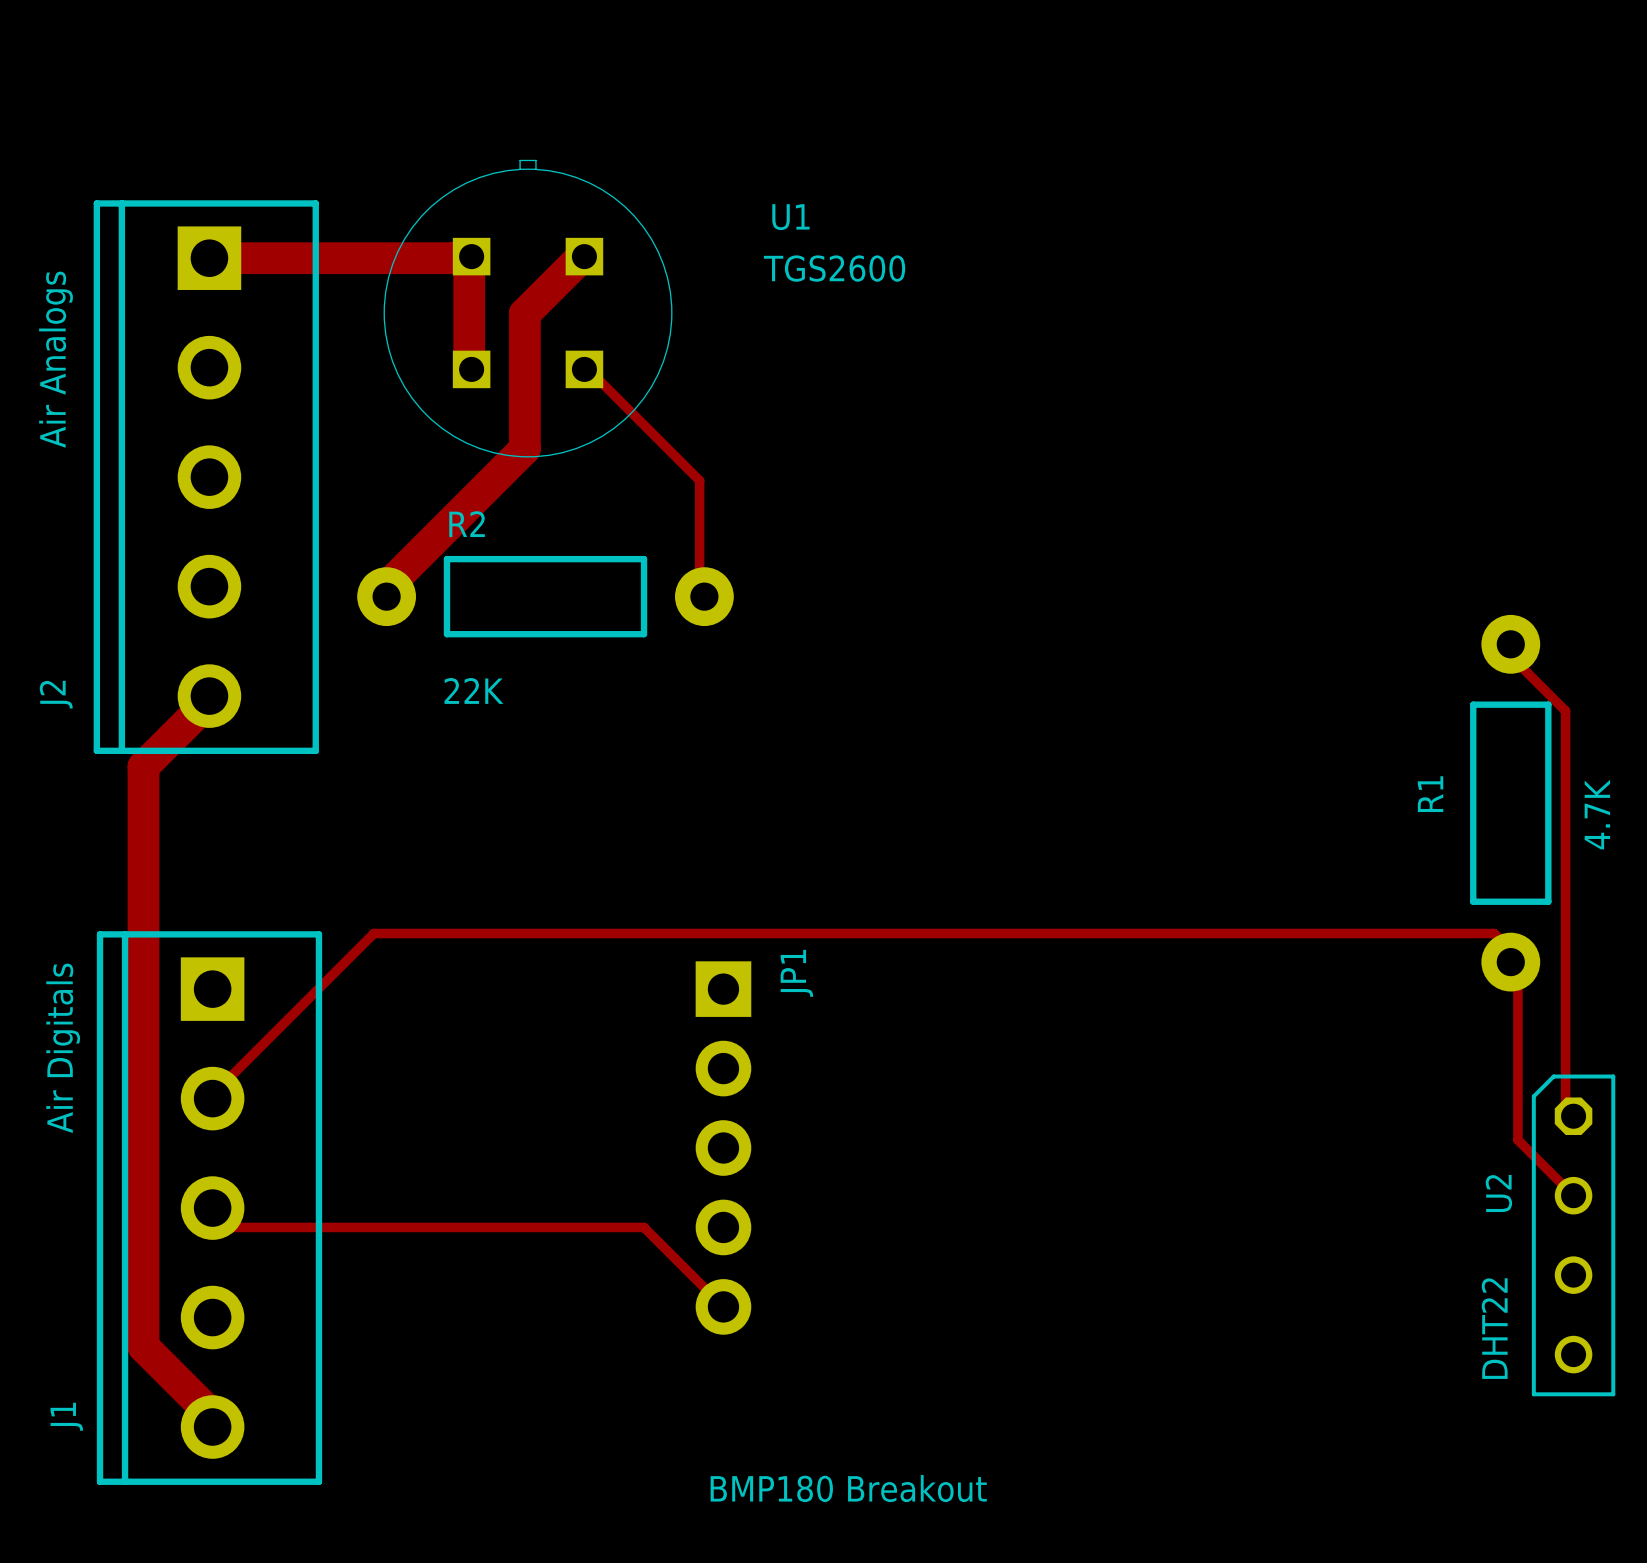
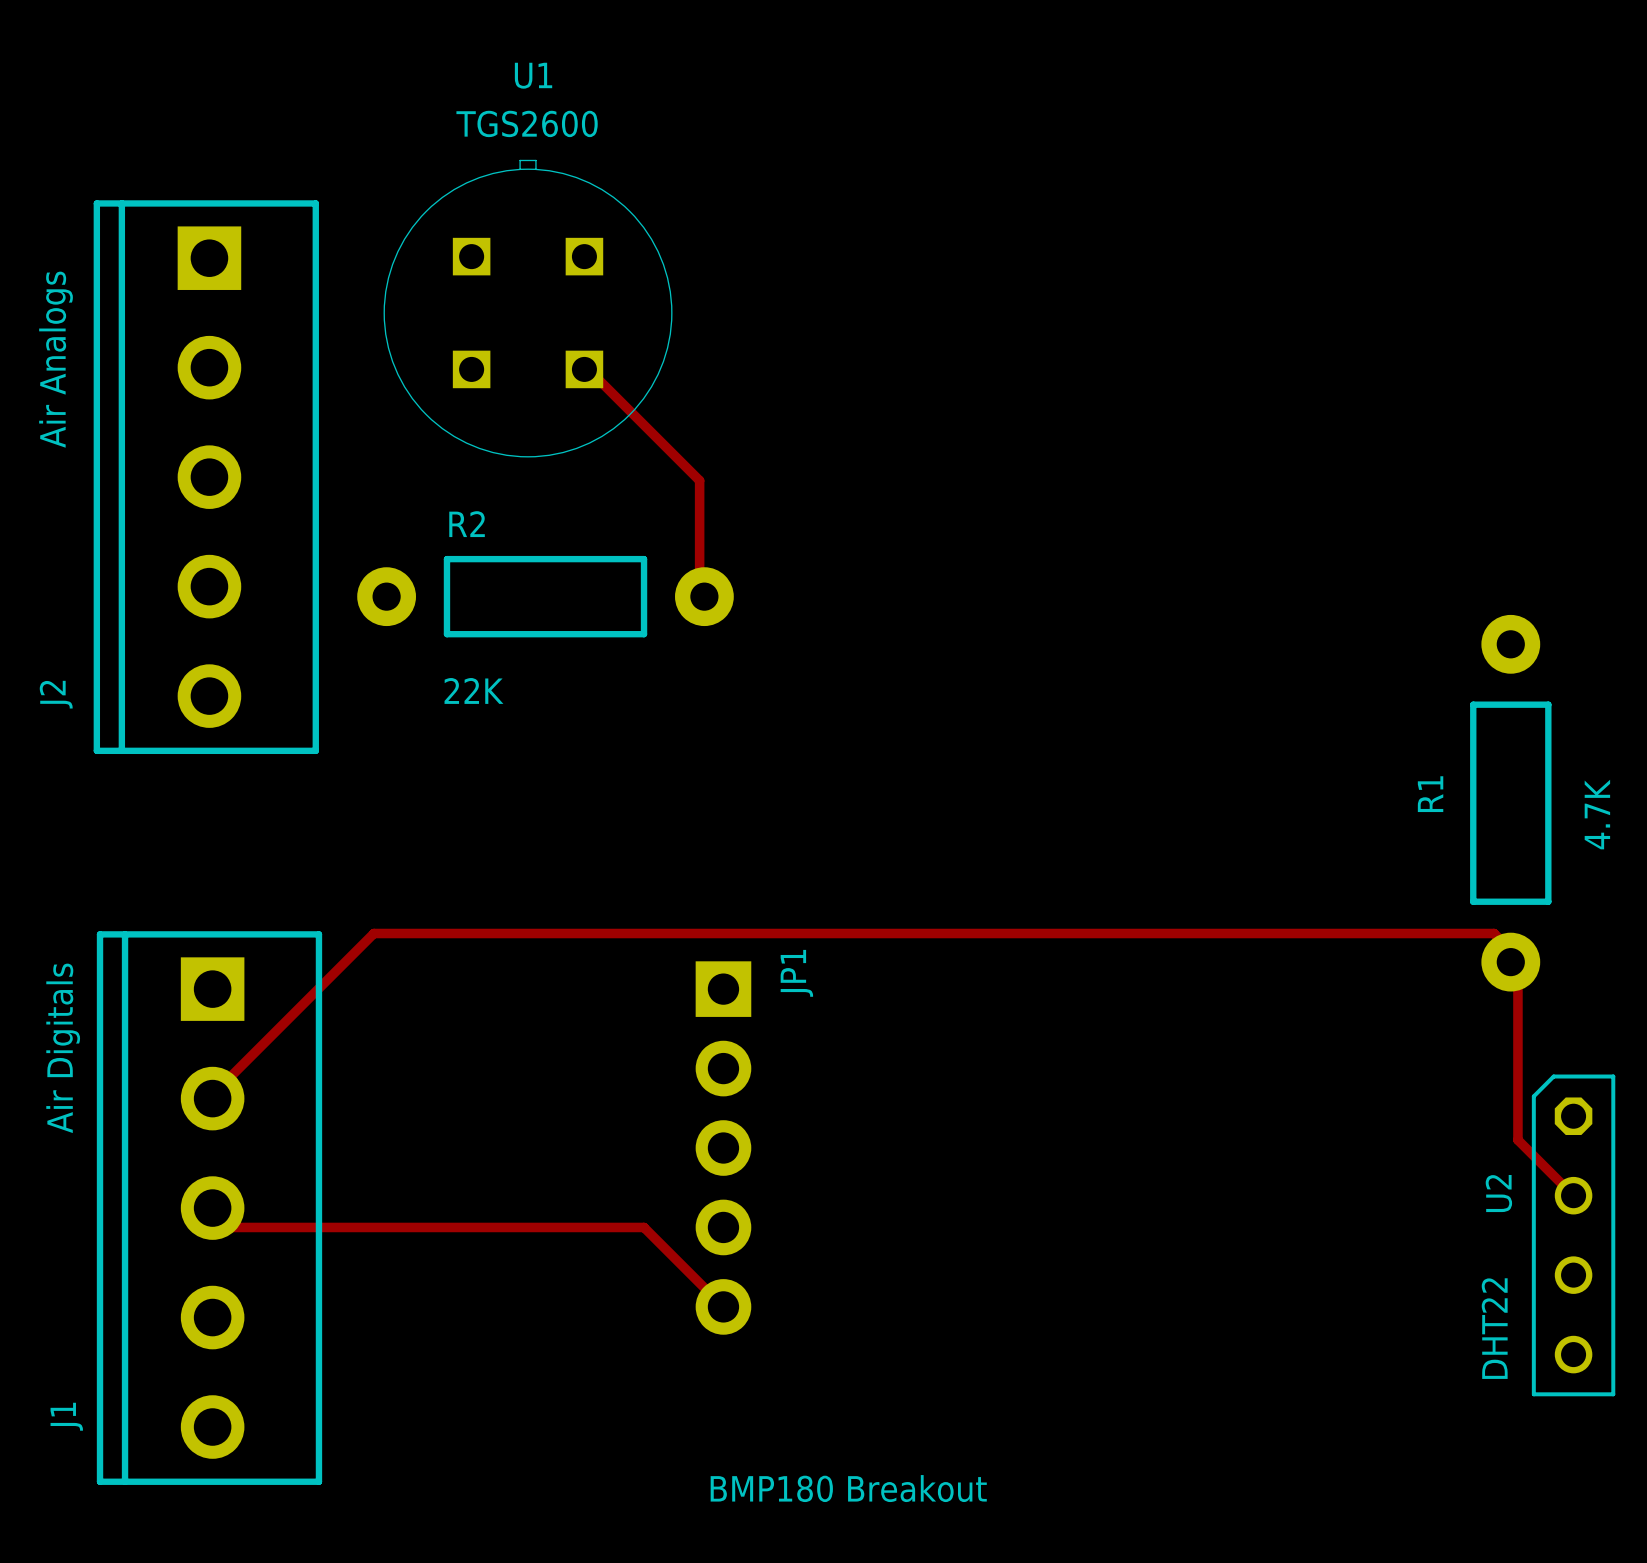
U1 name position: U1 (790, 217) -> U1 (533, 75)
track: (584, 256) (580, 258) (524, 313) (524, 448) (389, 583) (389, 591) (386, 596) -> none
track: (209, 258) (471, 256) (469, 258) (469, 369) (471, 369) -> none
U1 value position: TGS2600 (834, 268) -> TGS2600 (527, 123)
track: (1510, 644) (1517, 647) (1517, 663) (1565, 711) (1565, 1108) (1573, 1116) -> none
track: (209, 696) (207, 703) (143, 766) (143, 1346) (207, 1410) (207, 1426) (212, 1427) -> none

